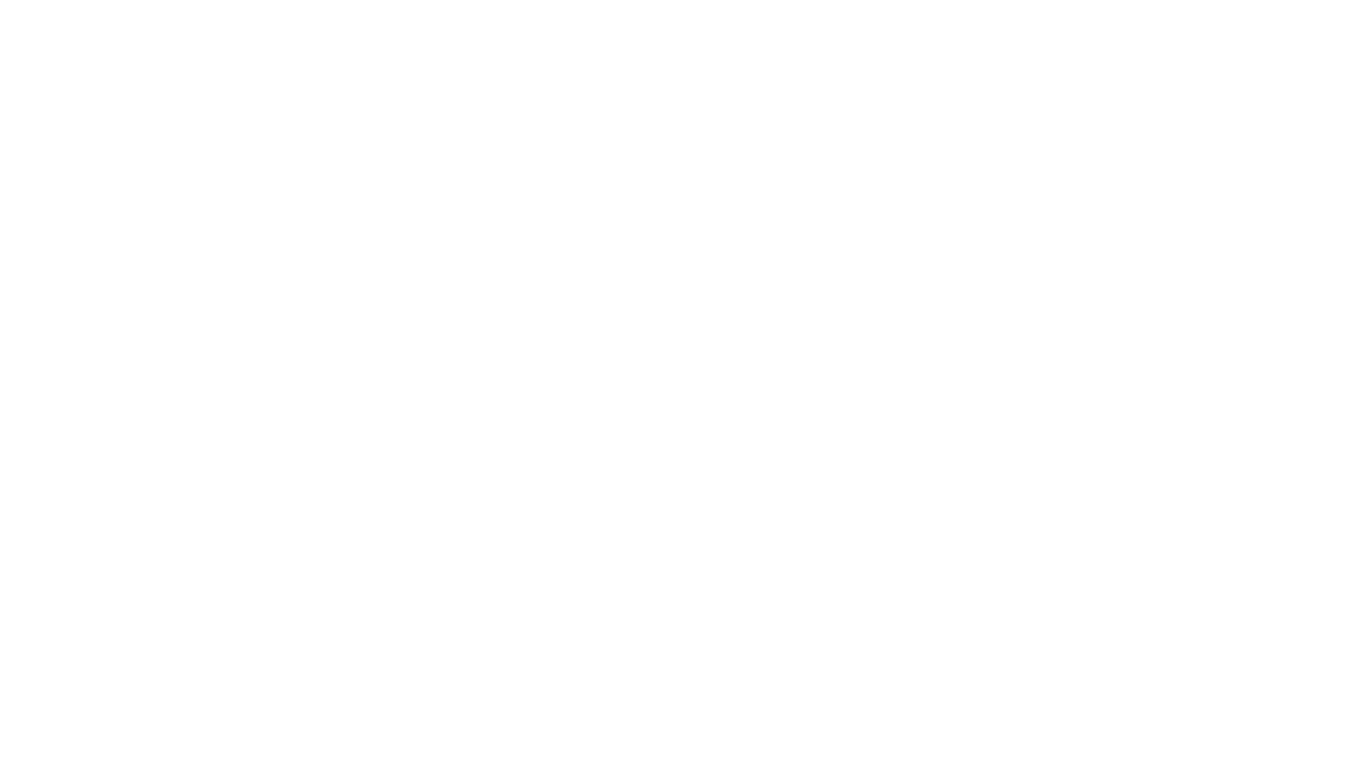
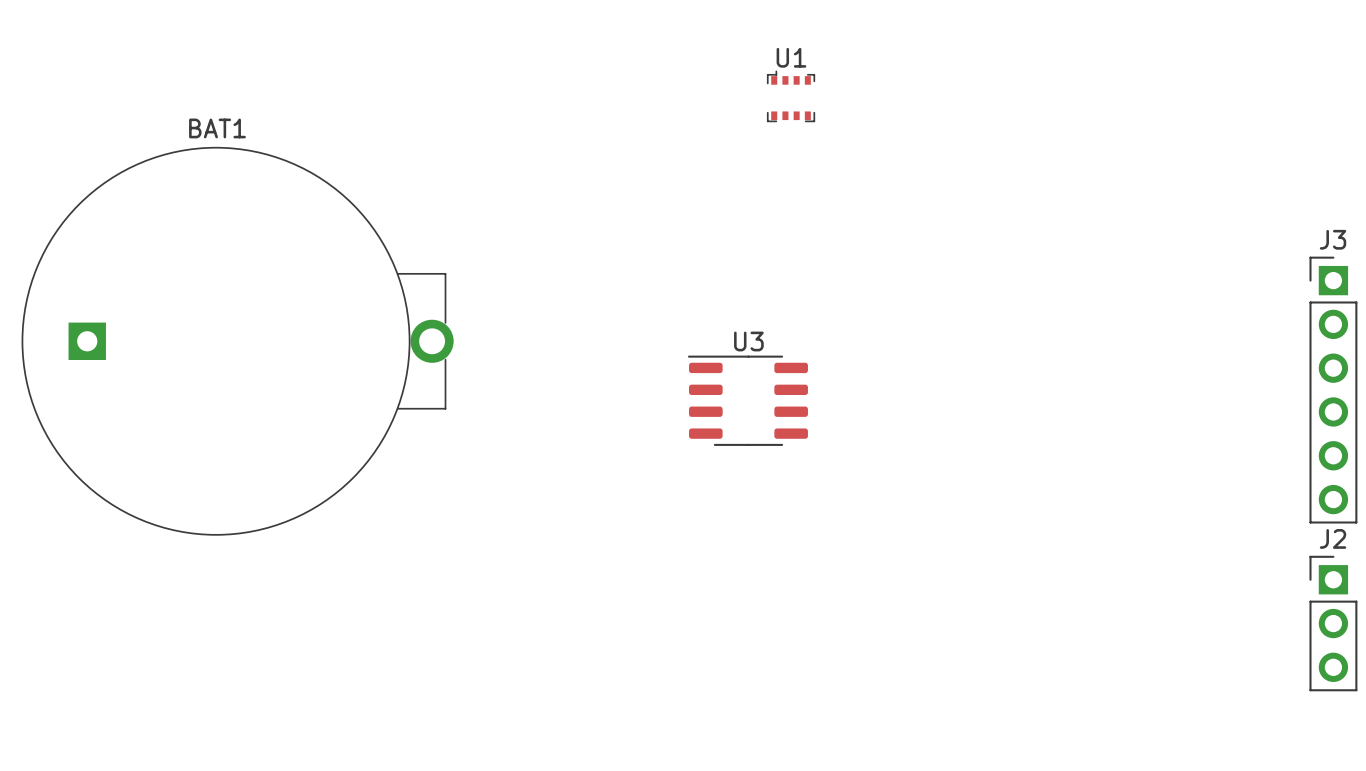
U1: none -> (791, 96)
BAT1: none -> (237, 341)
J3: none -> (1333, 390)
U3: none -> (747, 400)
J2: none -> (1333, 623)

